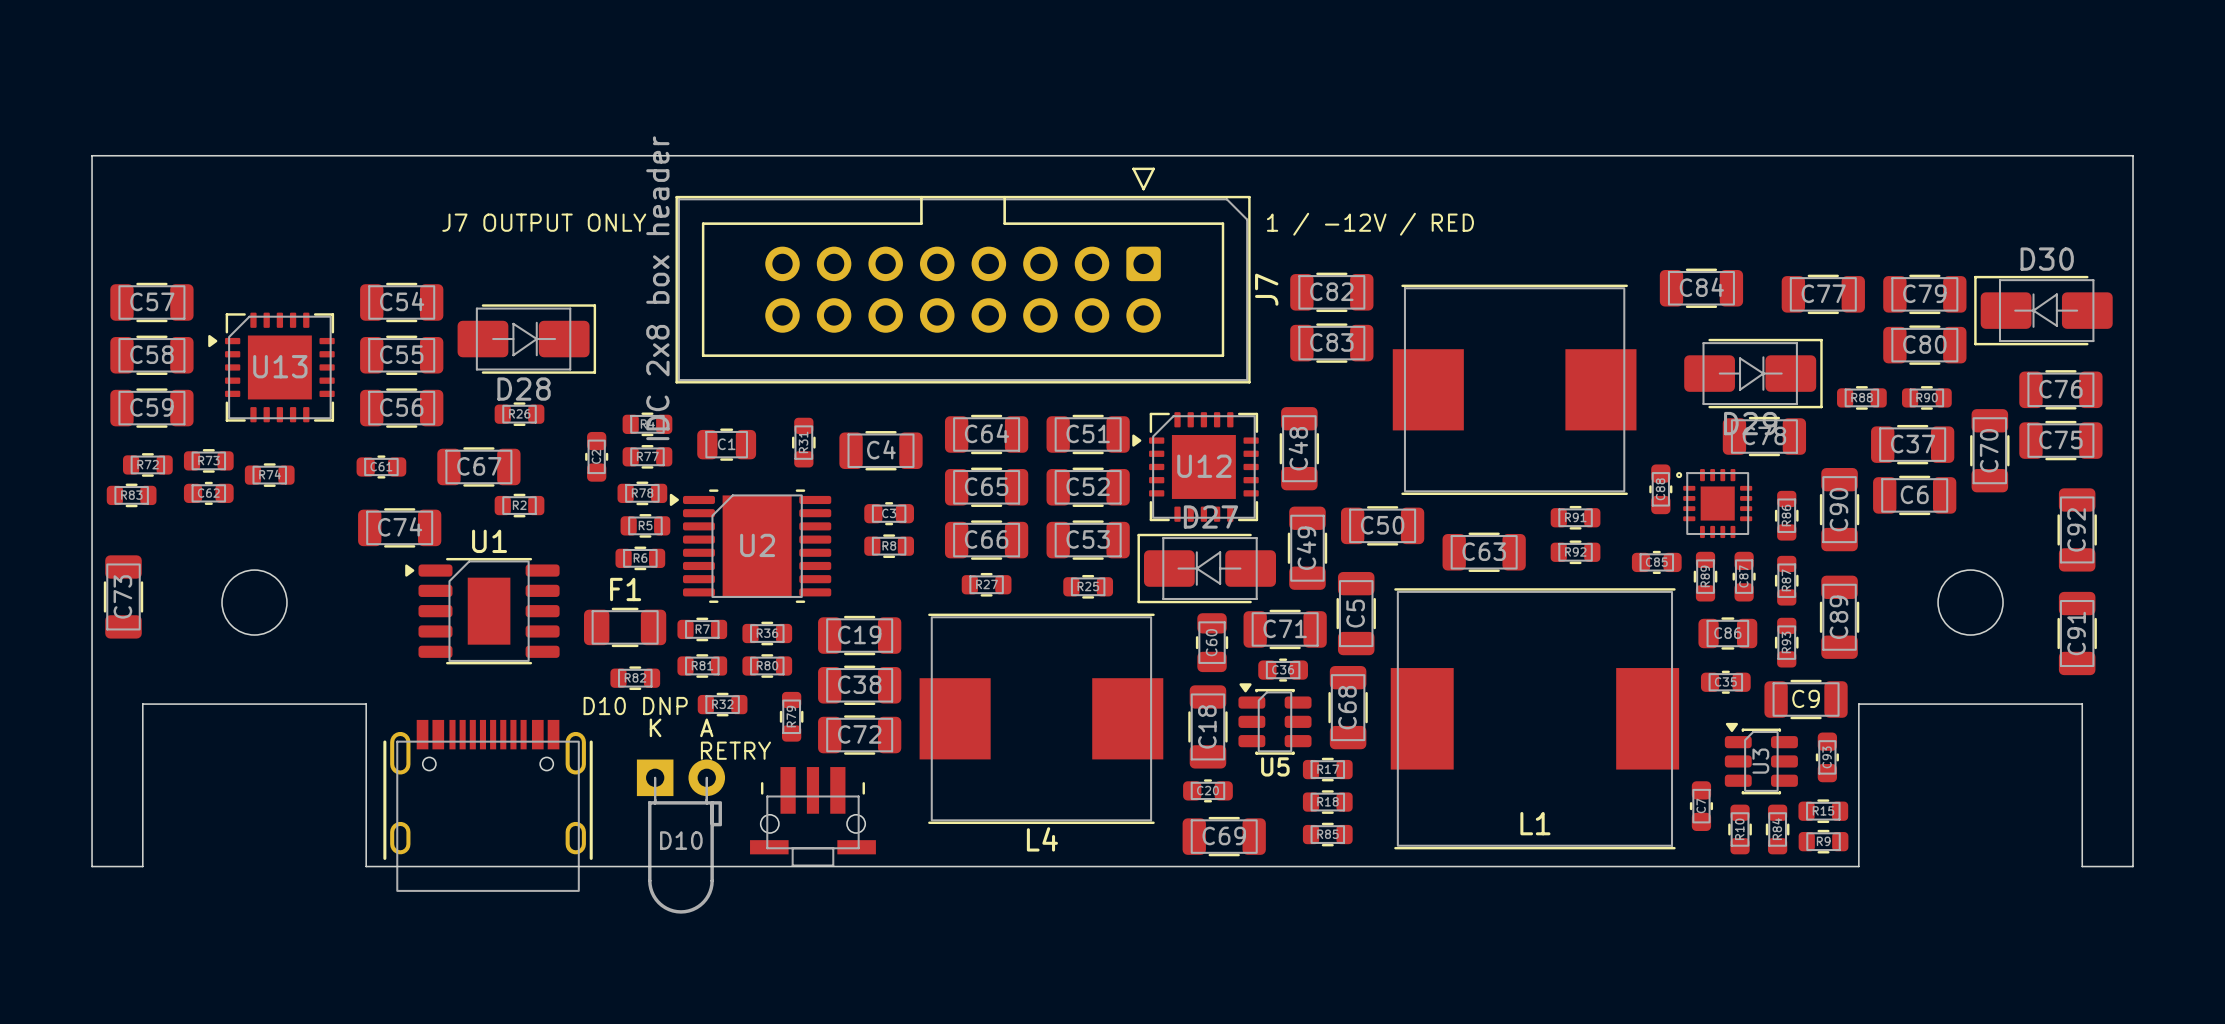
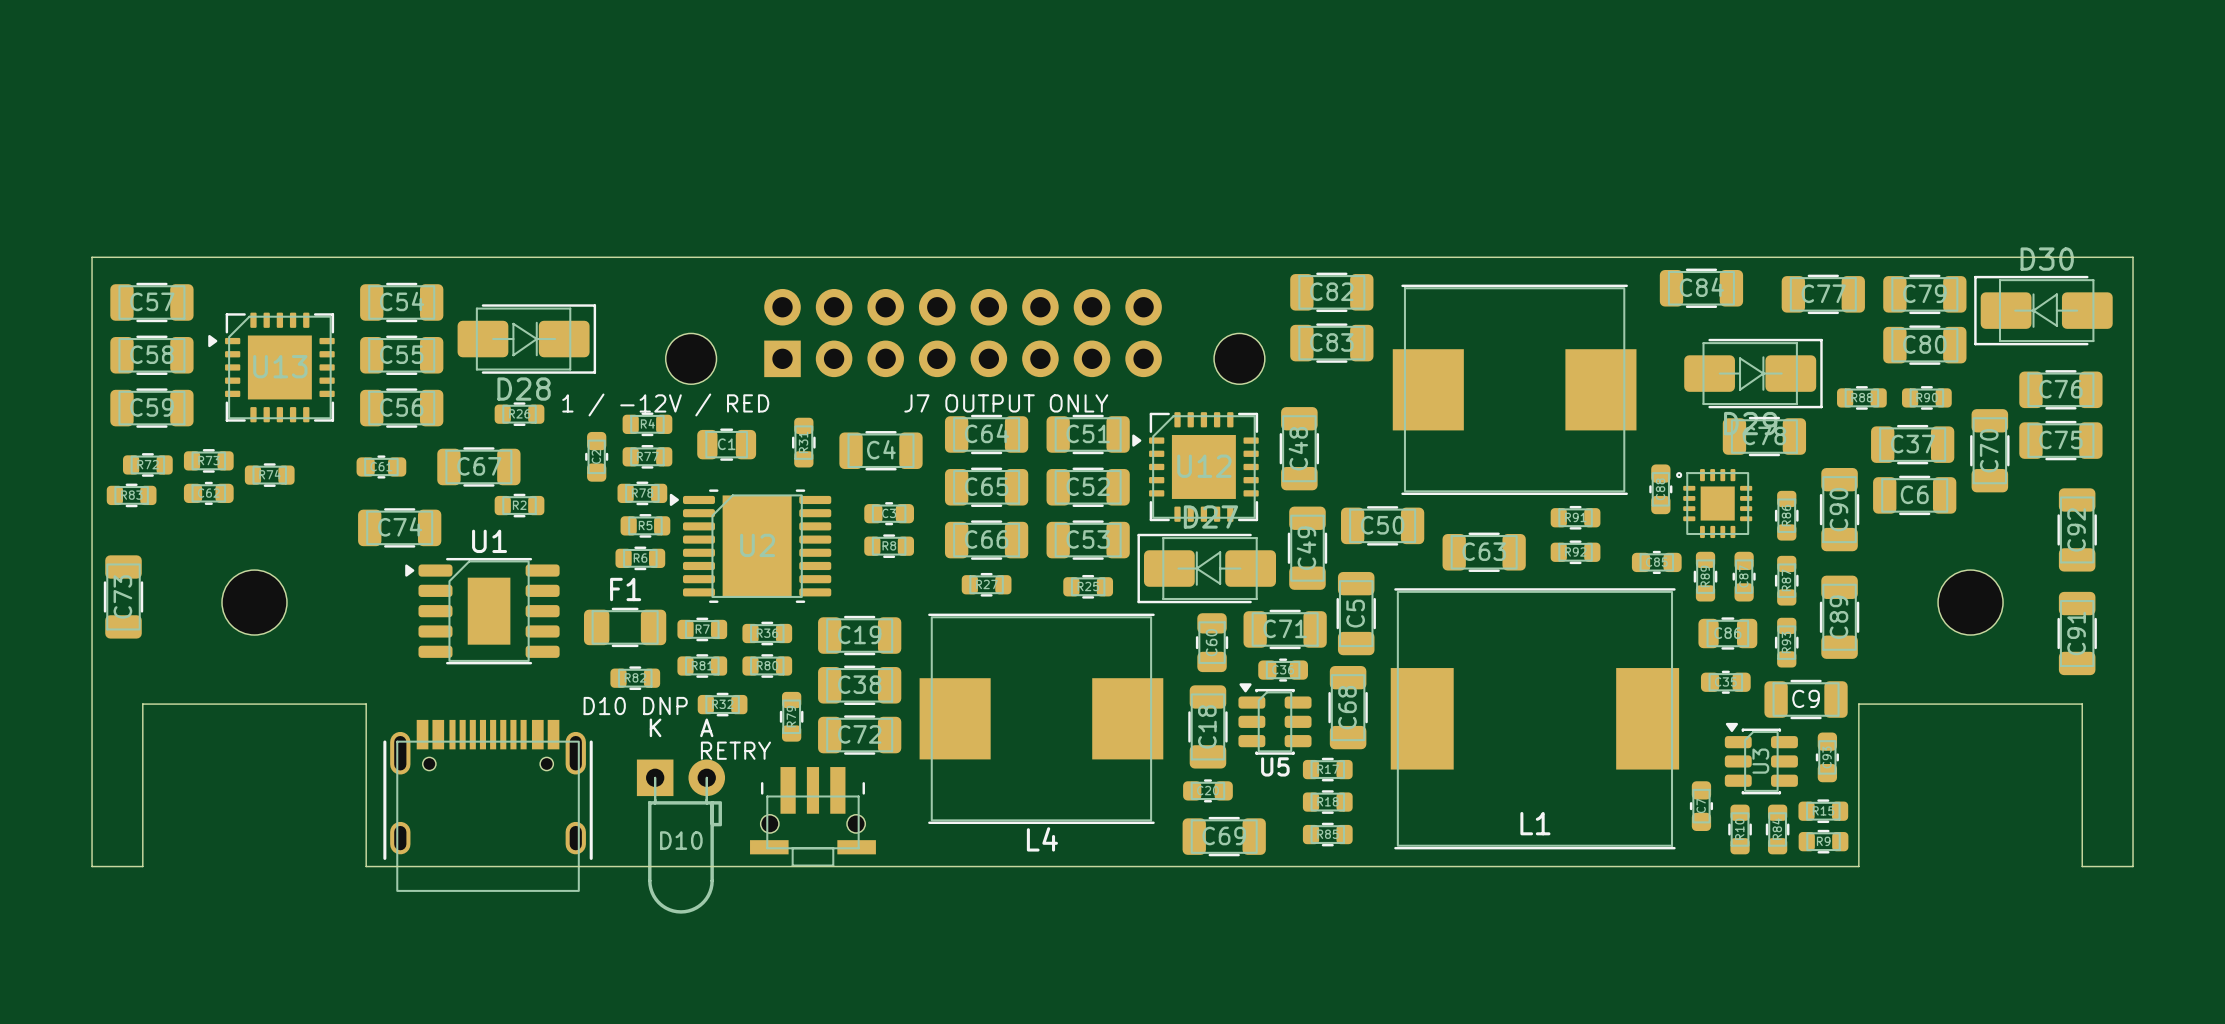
text position: J7 OUTPUT ONLY (544, 222) -> J7 OUTPUT ONLY (1006, 403)
text: 1 / -12V / RED (1370, 224) -> none
board edge: (92, 257) (92, 155) (2133, 155) (2133, 257) -> (92, 257) (2133, 257)
J7: IDC 2x8 box header (963, 275) -> none
part: none -> (963, 333)
part: none -> (691, 358)
part: none -> (1239, 358)
text: none -> 1 / -12V / RED (665, 404)

